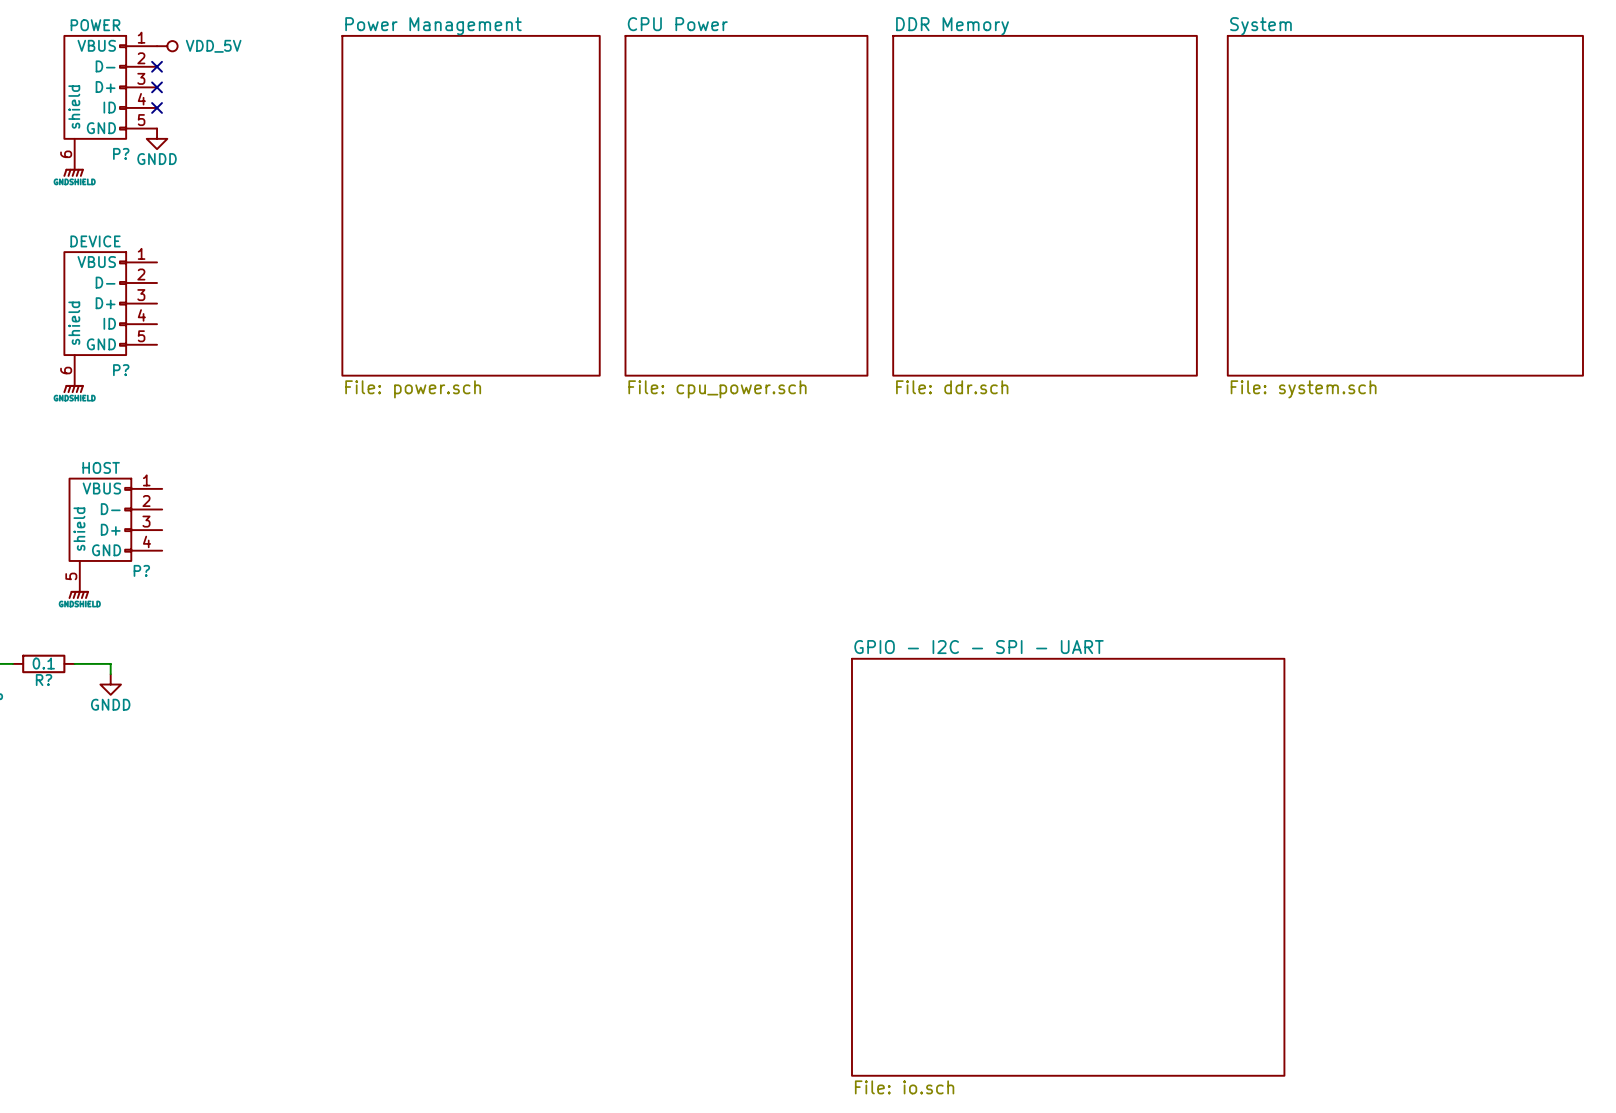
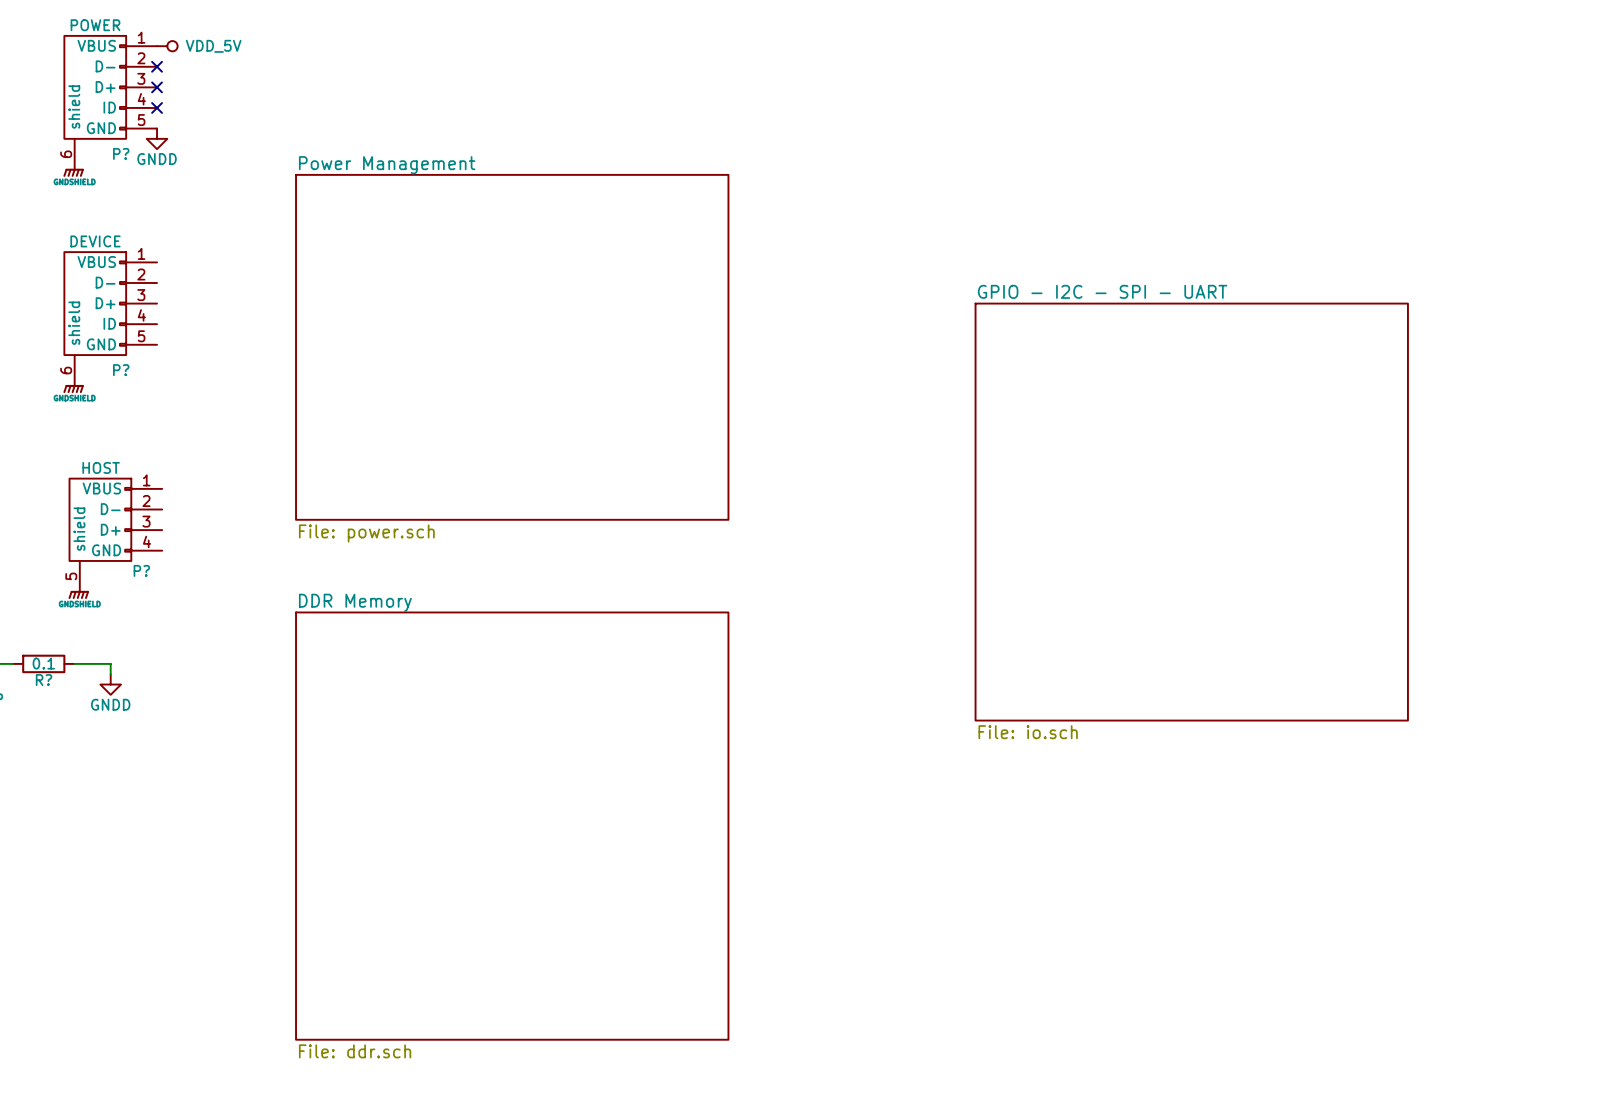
sheet Power Management: File: power.sch (471, 205) -> none
sheet CPU Power: File: cpu_power.sch (746, 205) -> none
sheet DDR Memory: File: ddr.sch (1045, 205) -> none
sheet System: File: system.sch (1405, 205) -> none
sheet Power Management: none -> File: power.sch (512, 347)
sheet DDR Memory: none -> File: ddr.sch (512, 826)
sheet GPIO - I2C - SPI - UART position: (1068, 867) -> (1191, 512)

